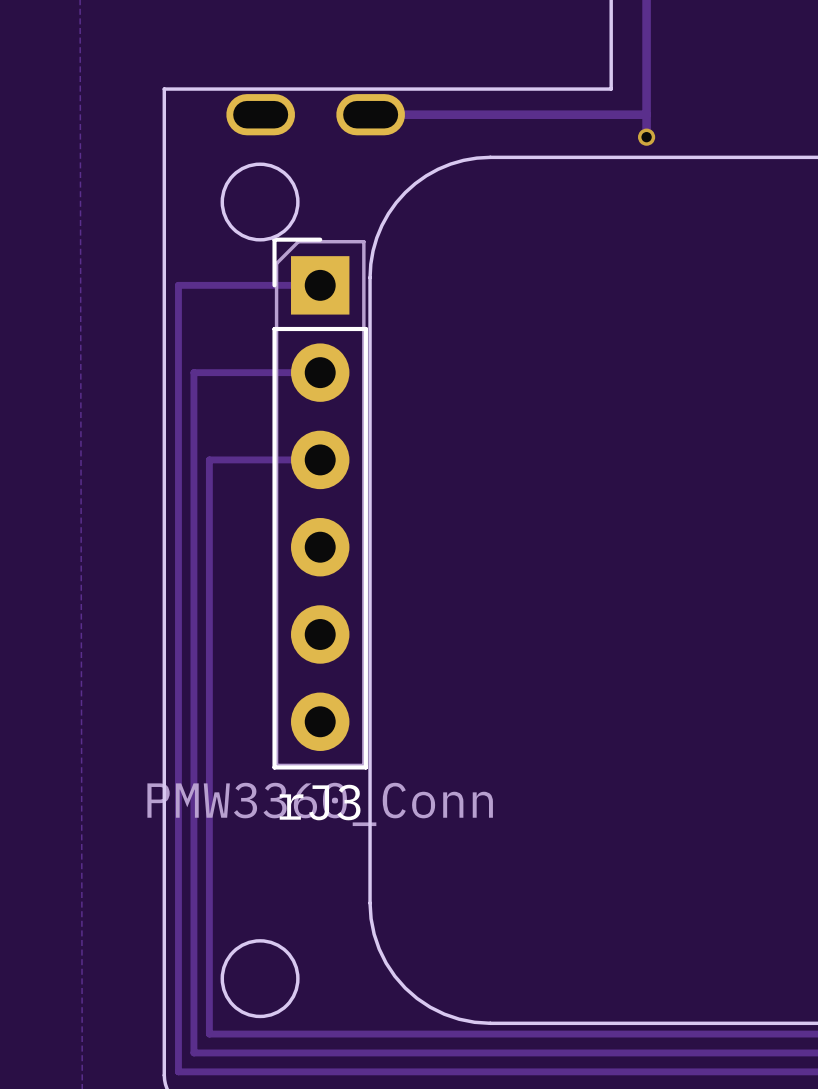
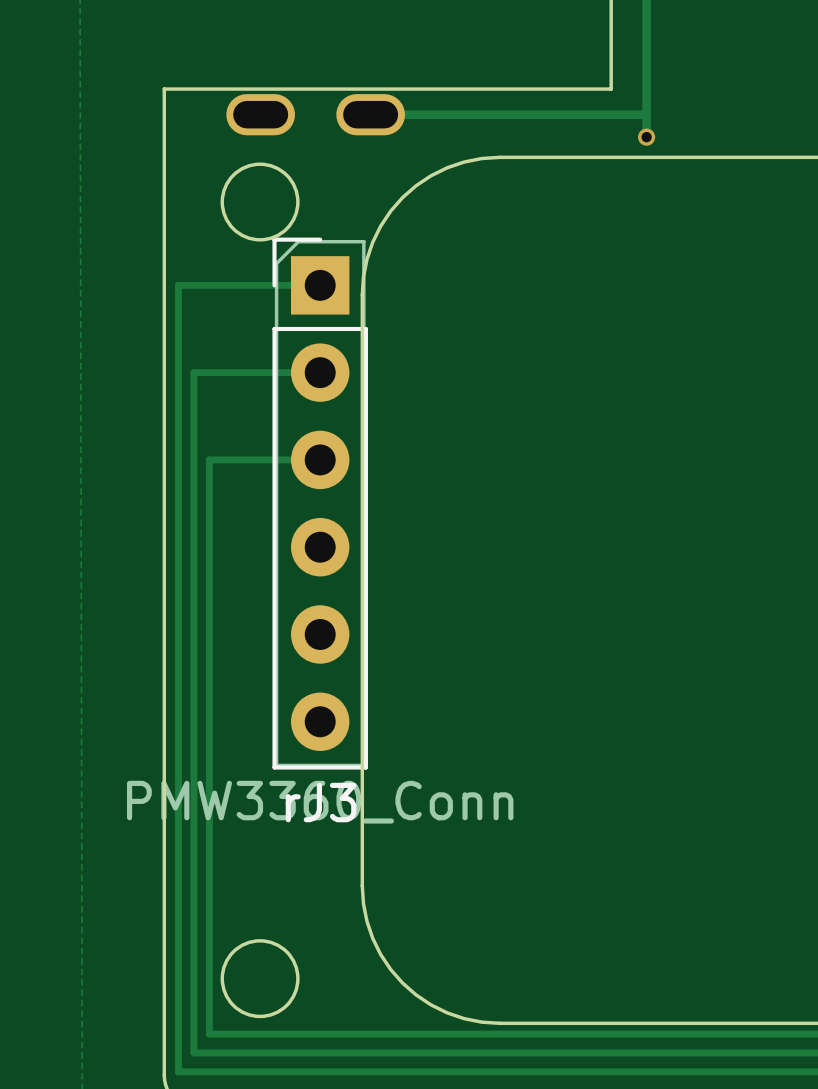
board edge: (499, 157) (476, 158) (450, 164) (426, 175) (405, 192) (388, 213) (376, 237) (373, 250) (370, 277) -> none
board edge: (370, 277) (371, 918) (374, 934) (386, 963) (405, 988) (417, 998) (430, 1007) (459, 1019) (474, 1022) (499, 1023) -> (499, 157) (481, 158) (447, 167) (431, 175) (402, 197) (380, 226) (372, 242) (363, 276) (362, 294) (363, 903) (372, 938) (380, 954) (402, 983) (416, 994) (447, 1012) (481, 1022) (499, 1023)

